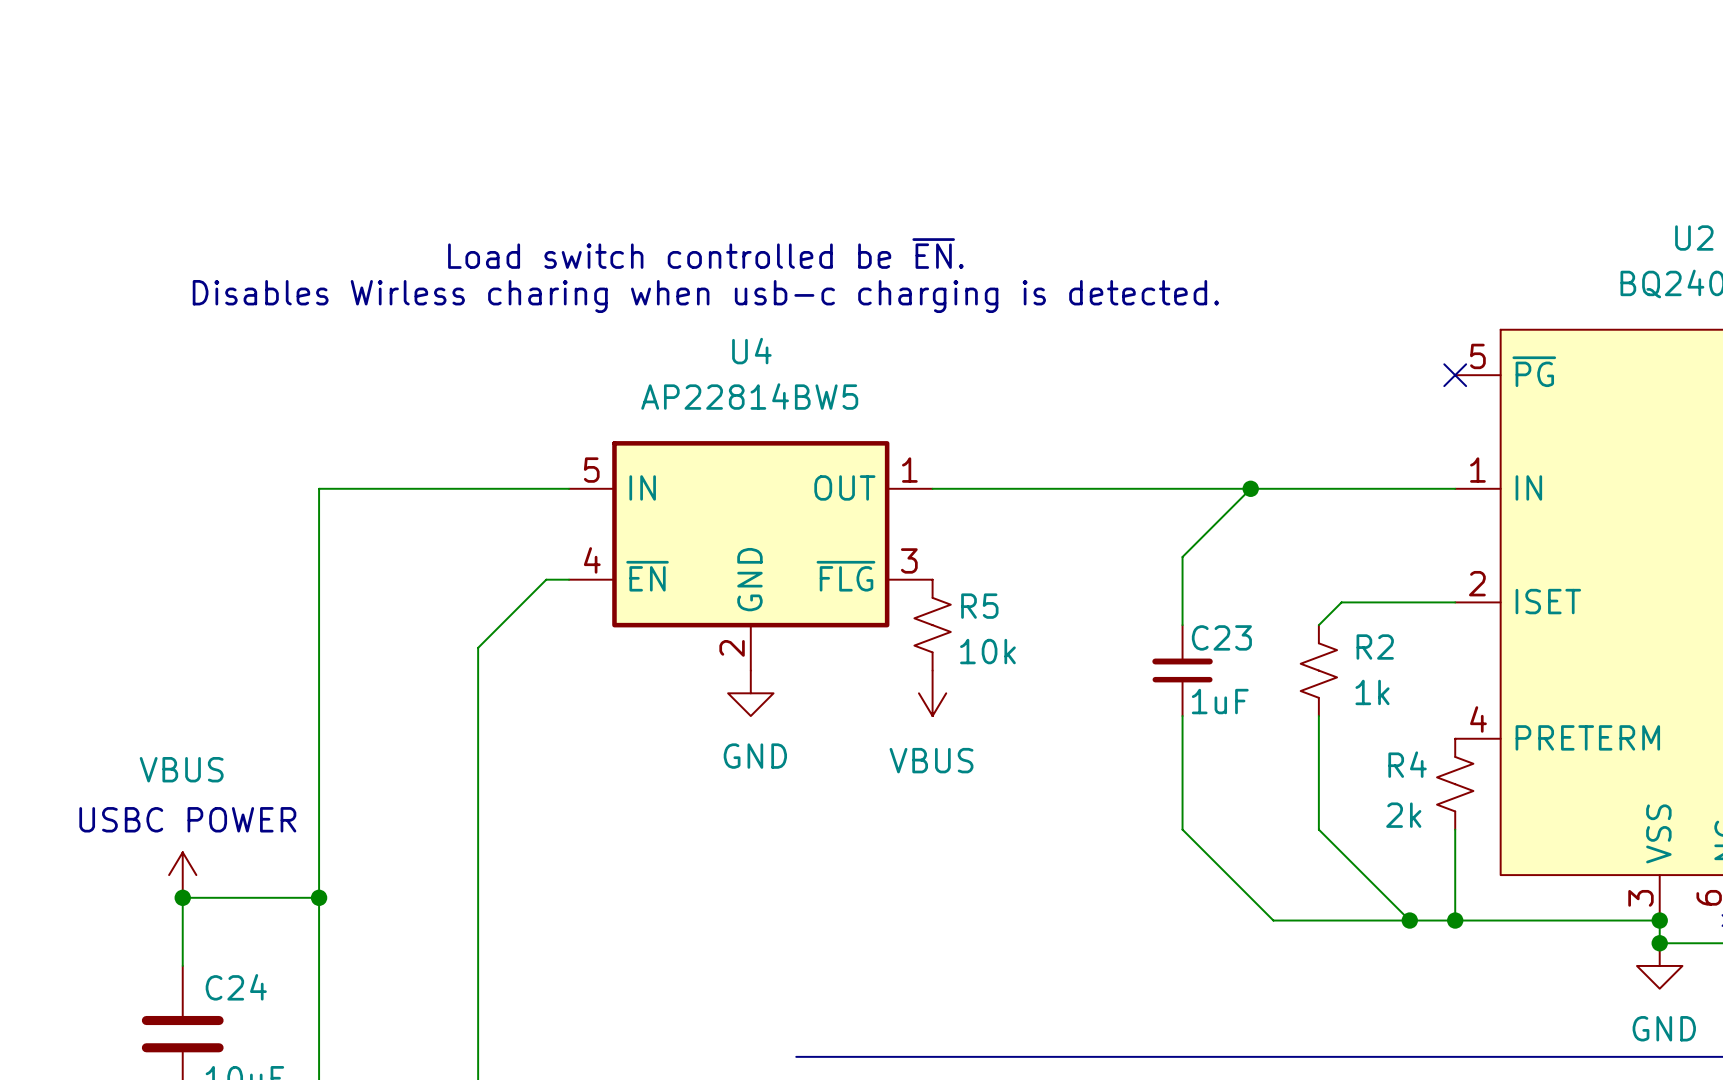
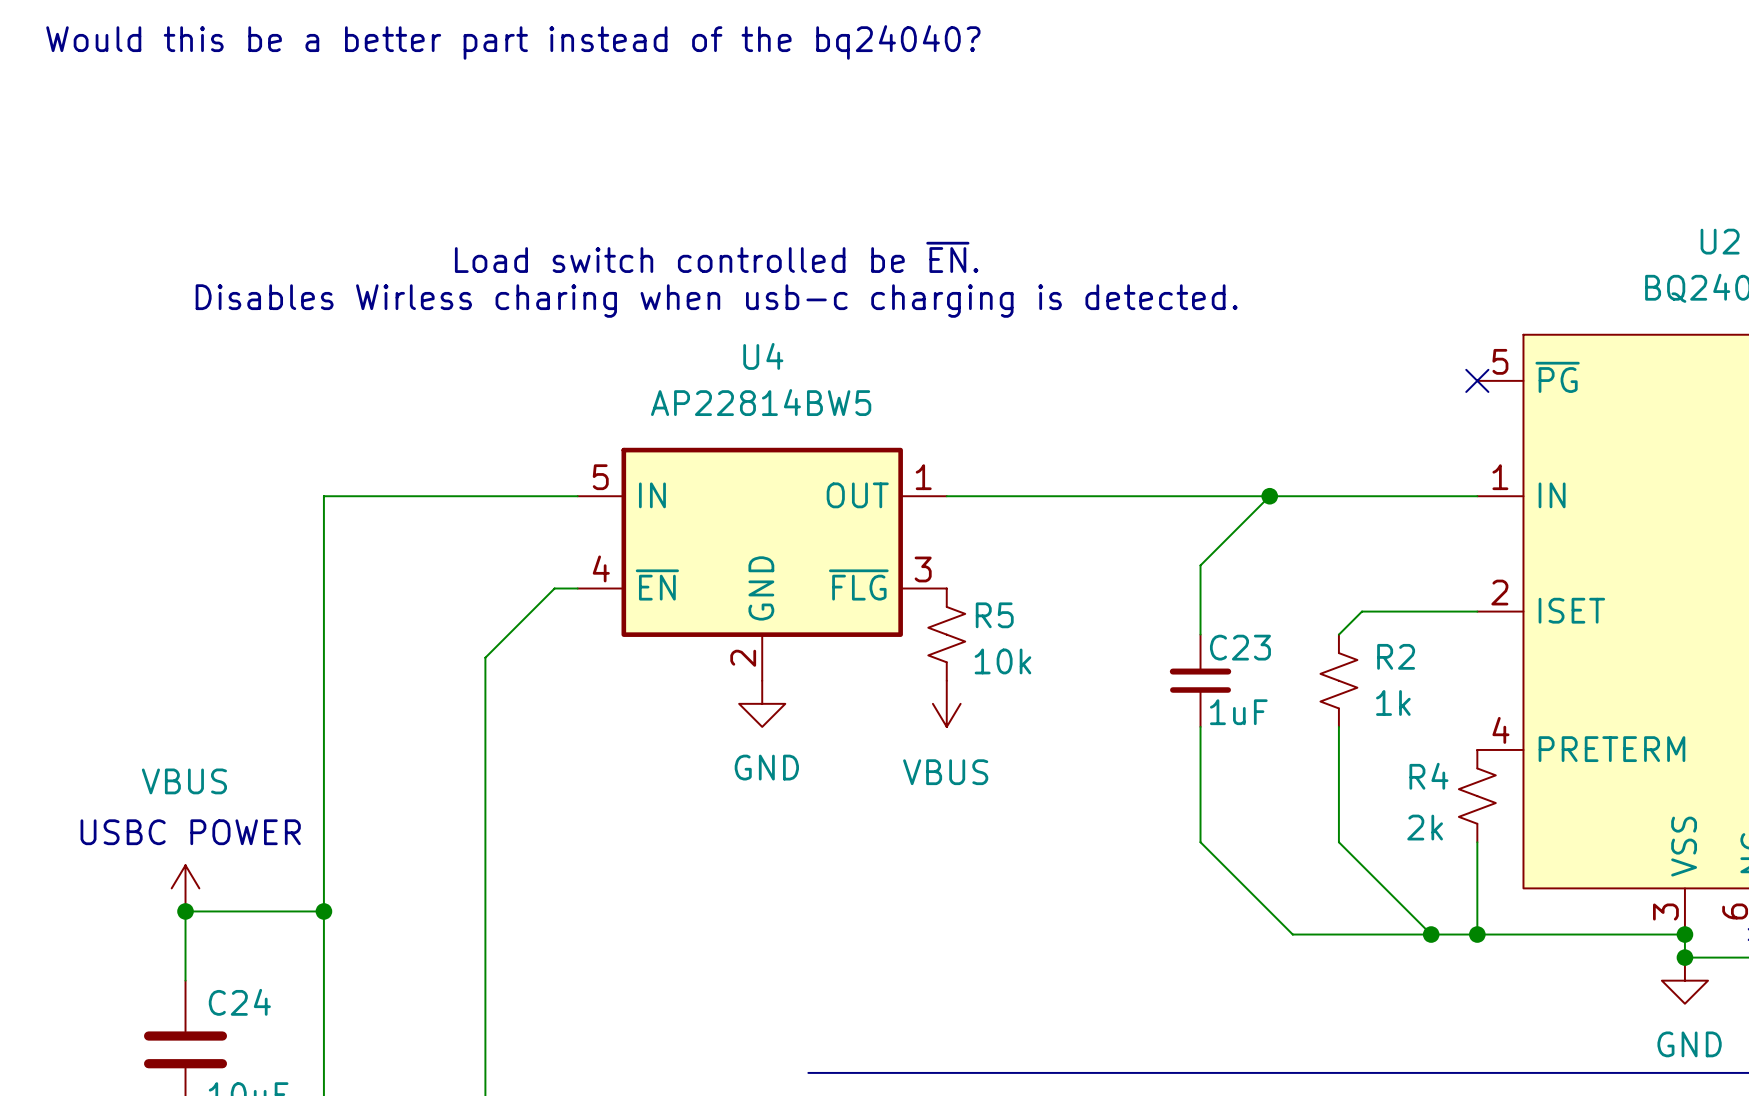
text: none -> Would this be a better part instead of the bq24040? (513, 42)

